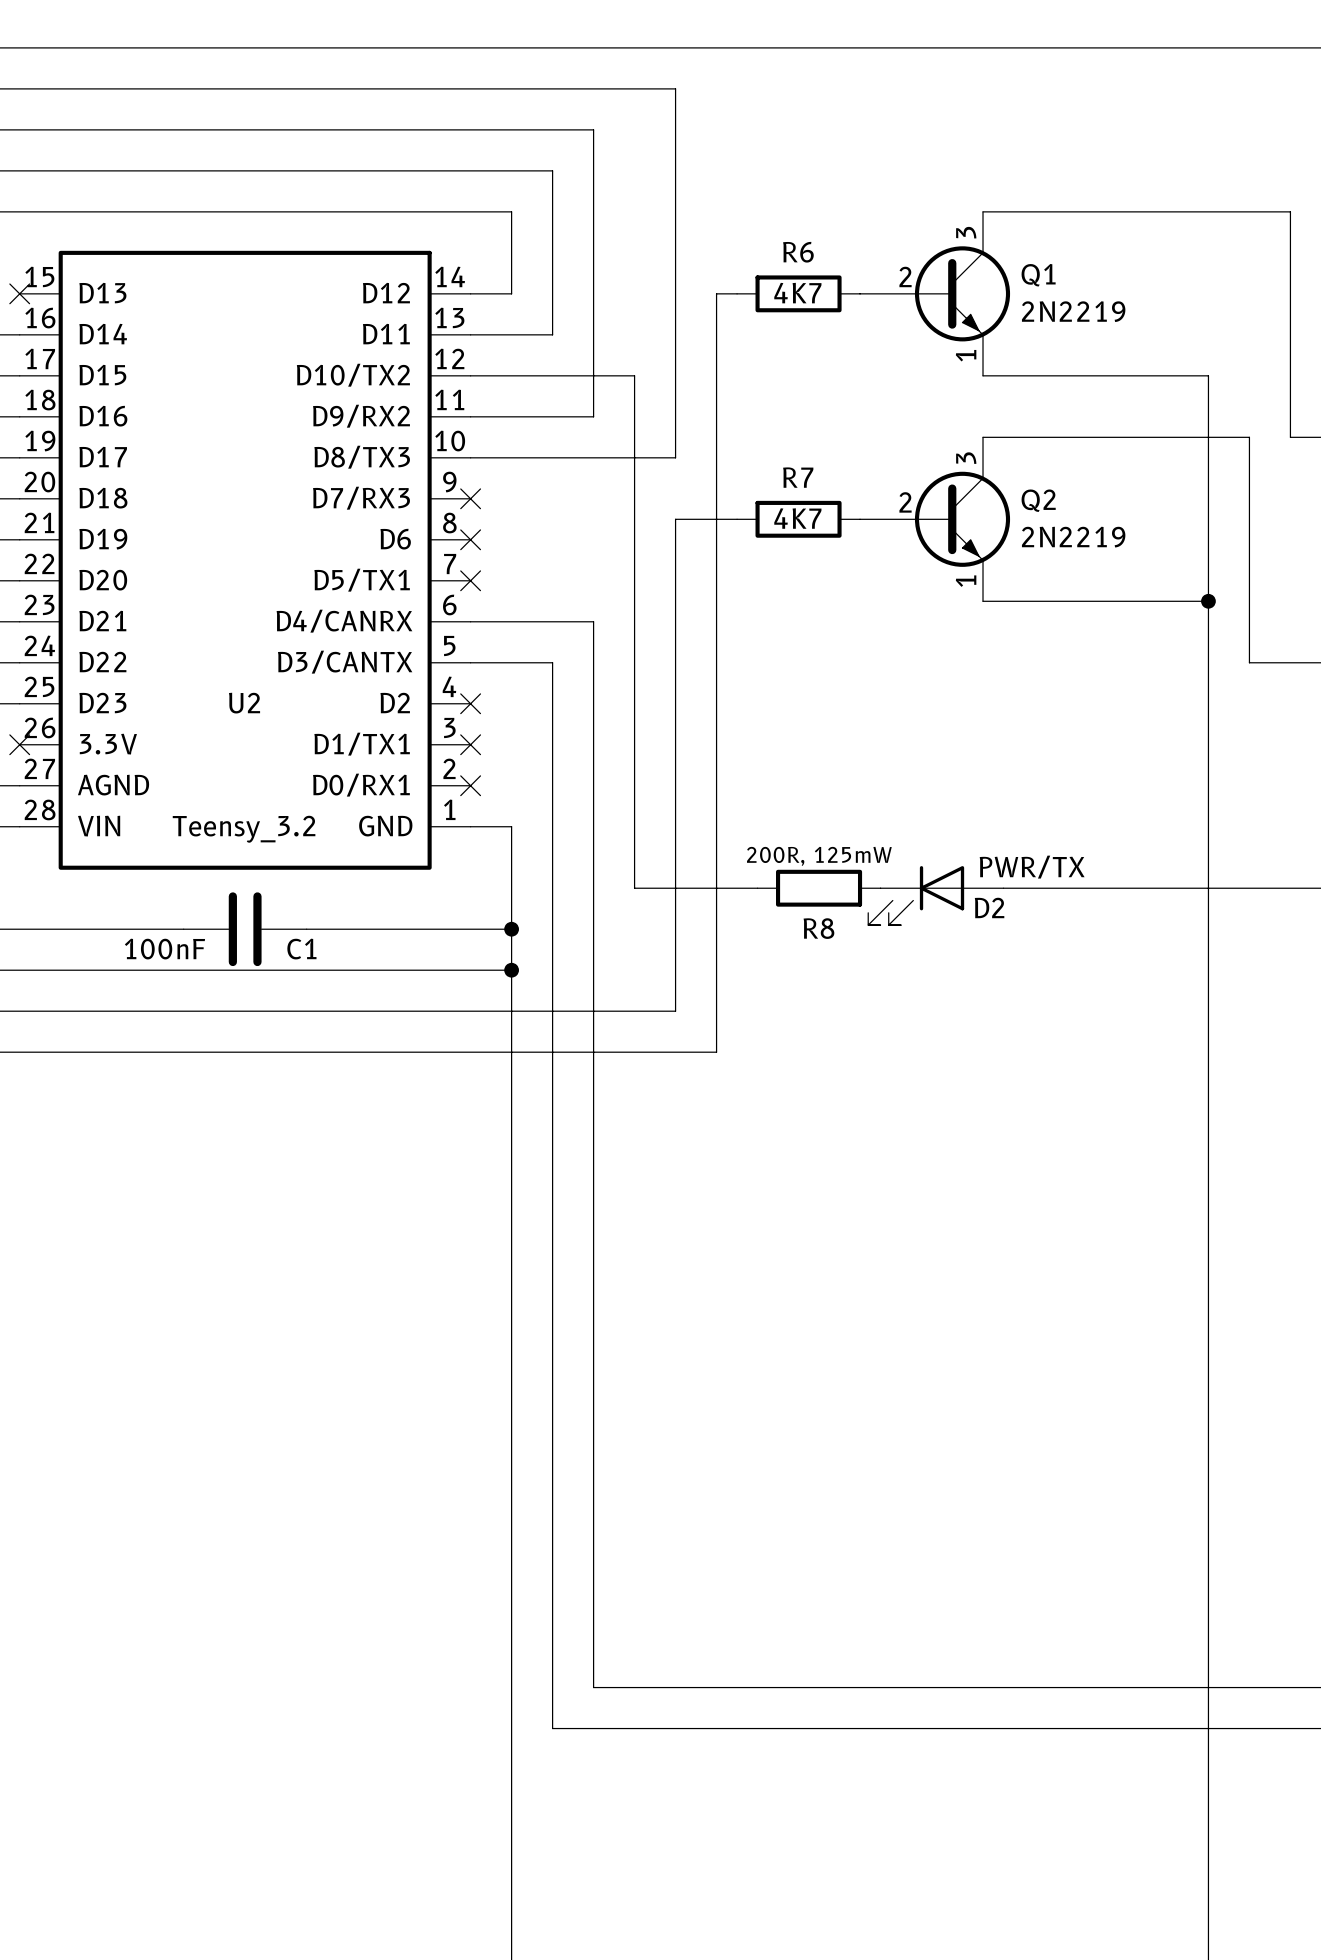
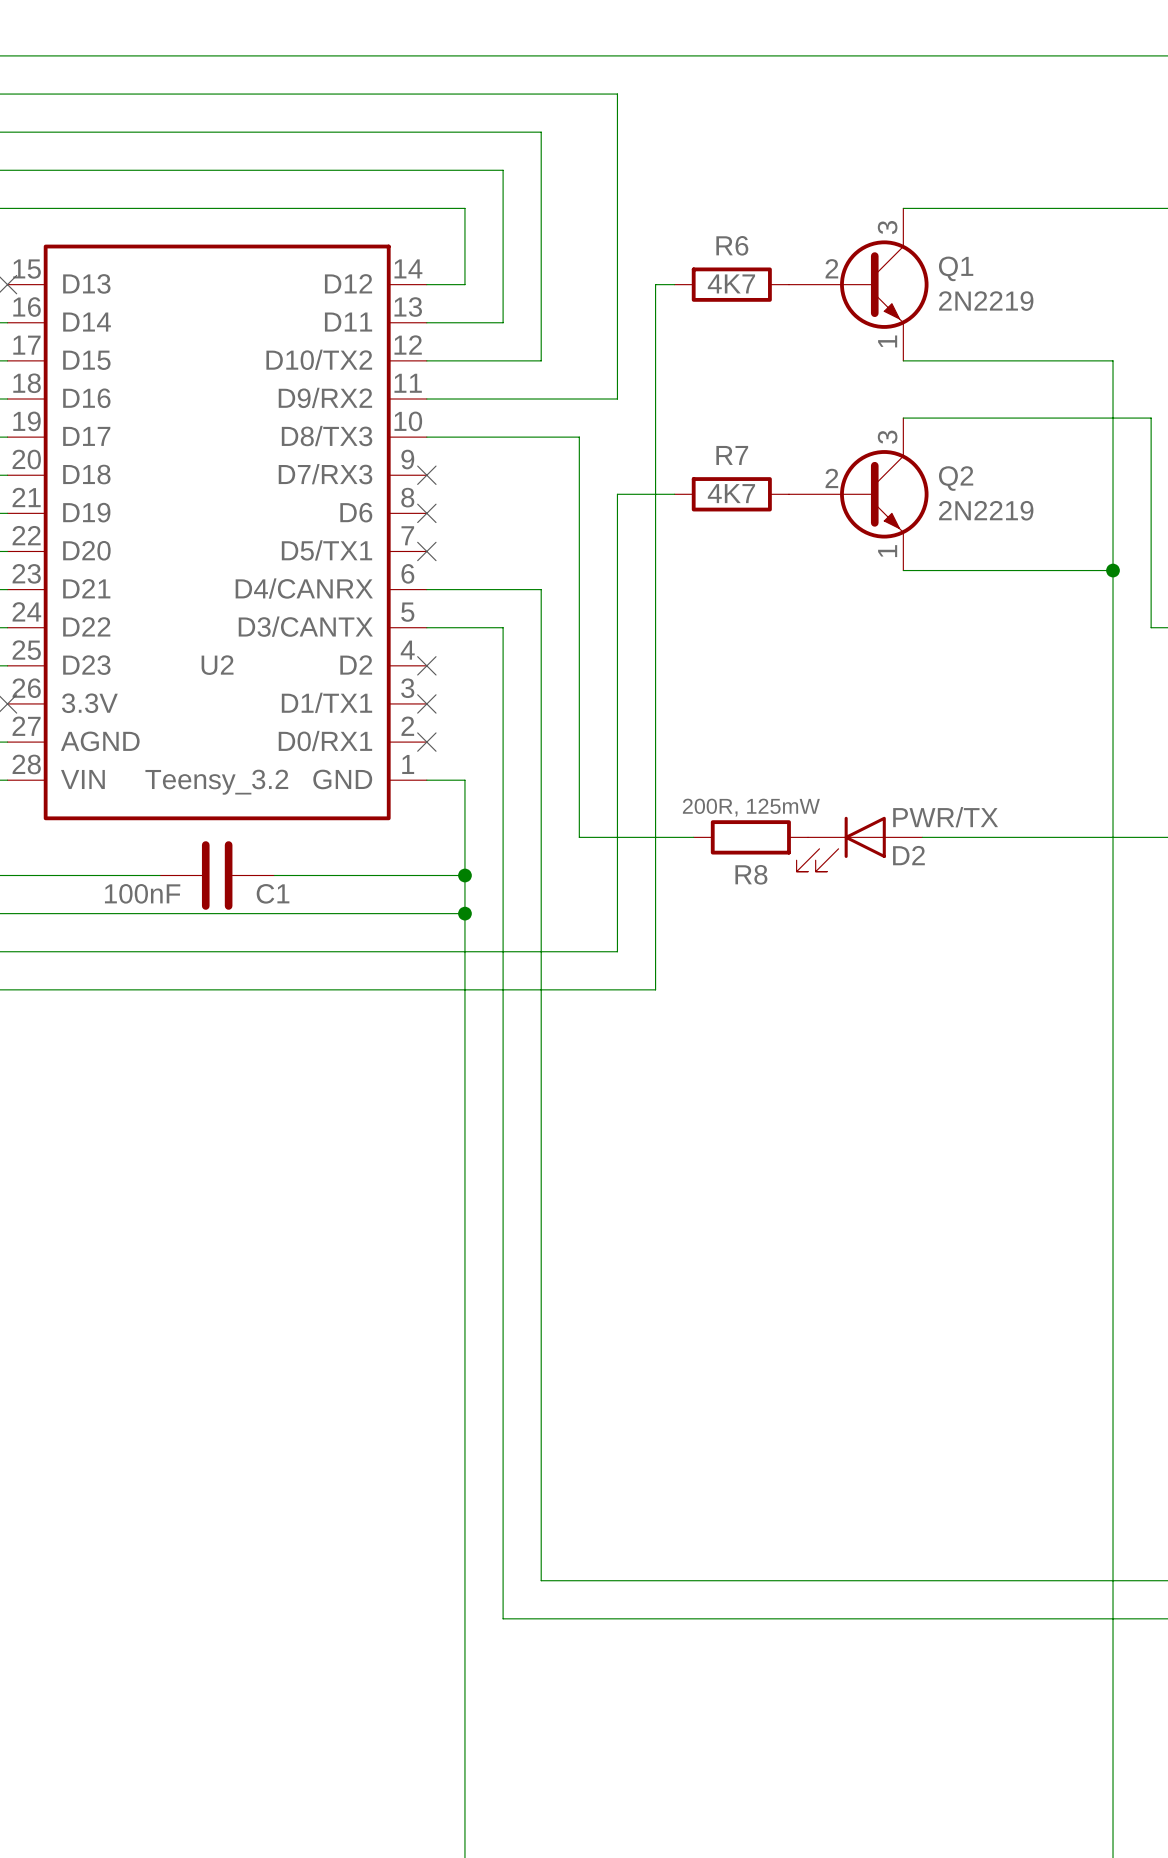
wire: (593, 416) (593, 375) (634, 375) (634, 457) (675, 457) (675, 416) -> (541, 399) (617, 399)

